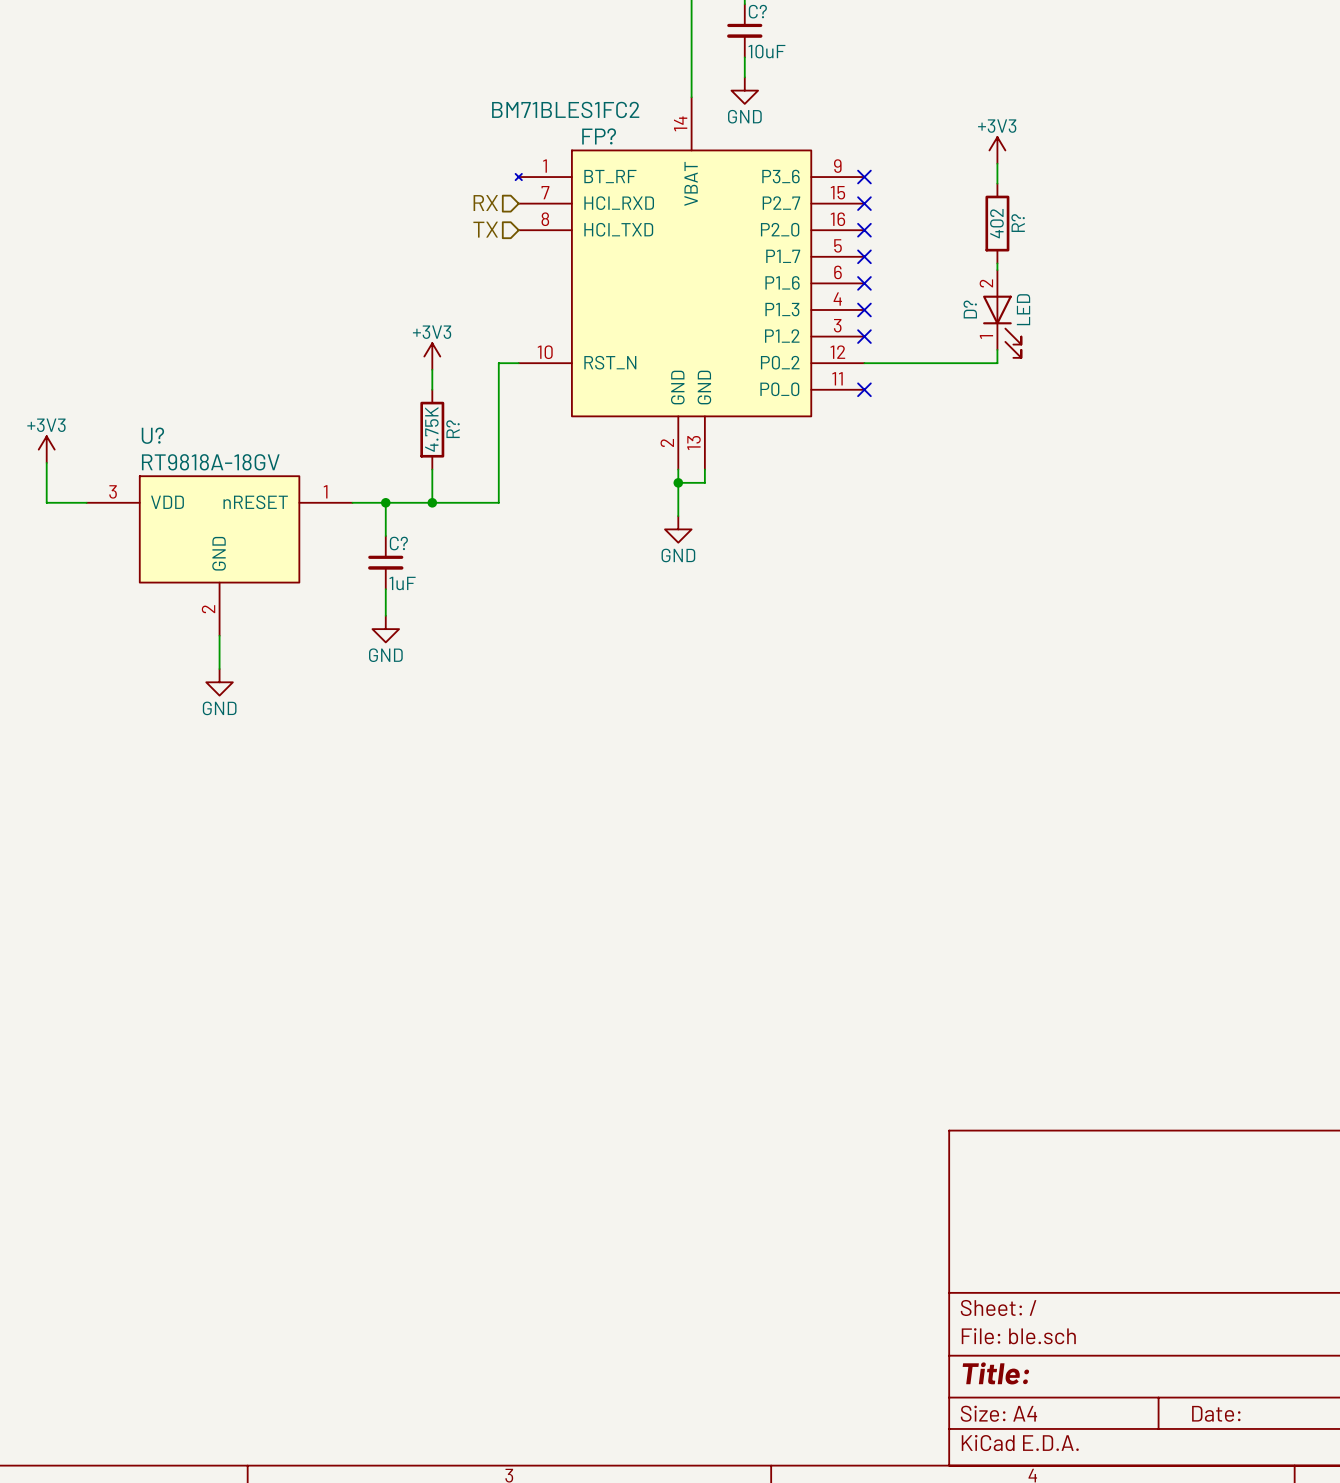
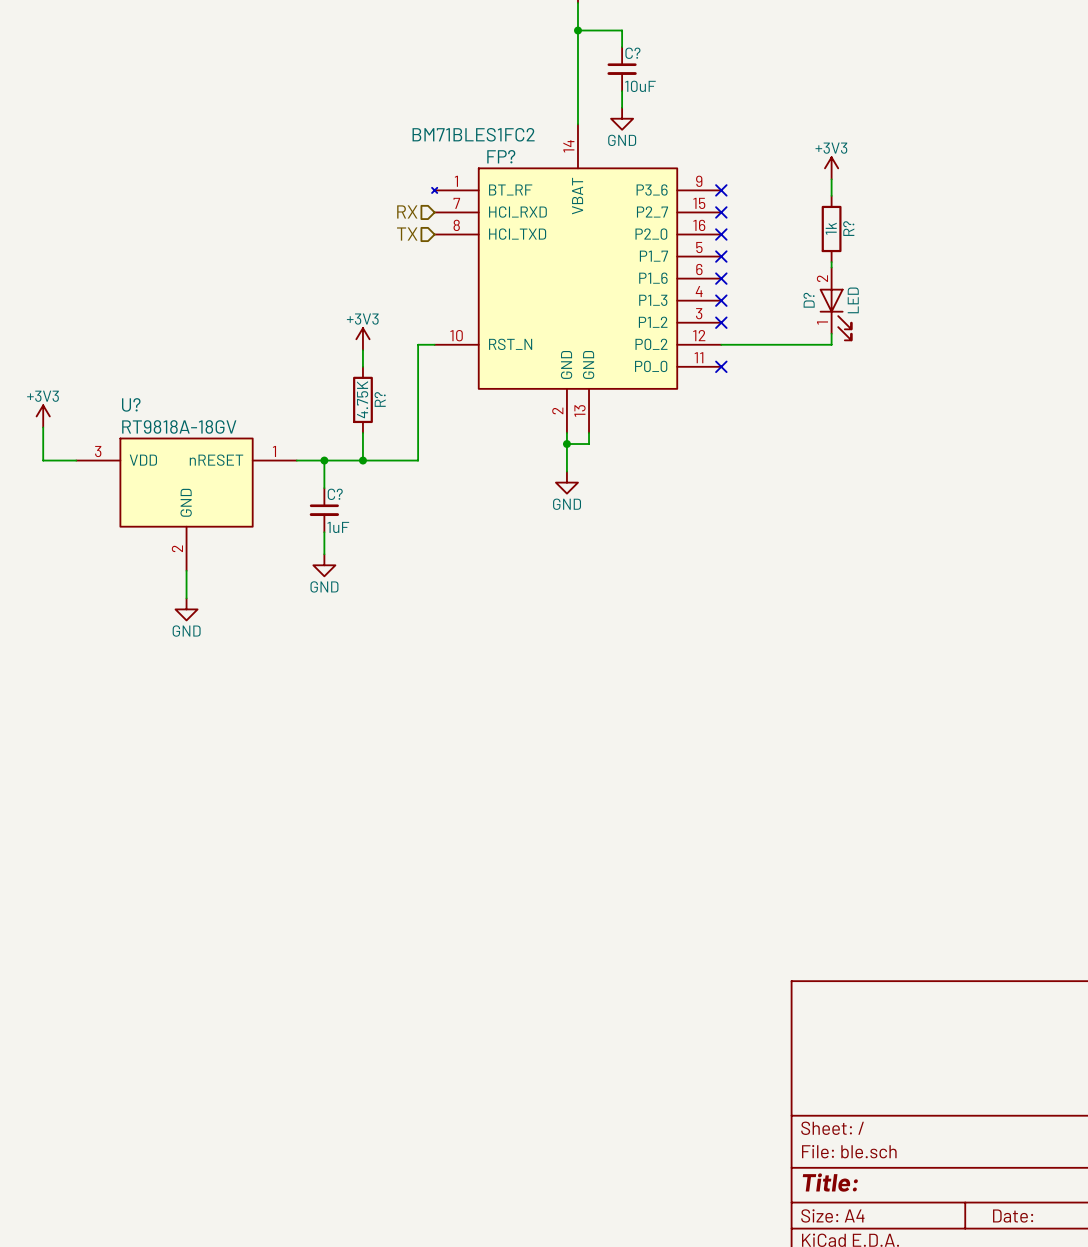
R? value: 402 (996, 223) -> 1k (831, 228)

